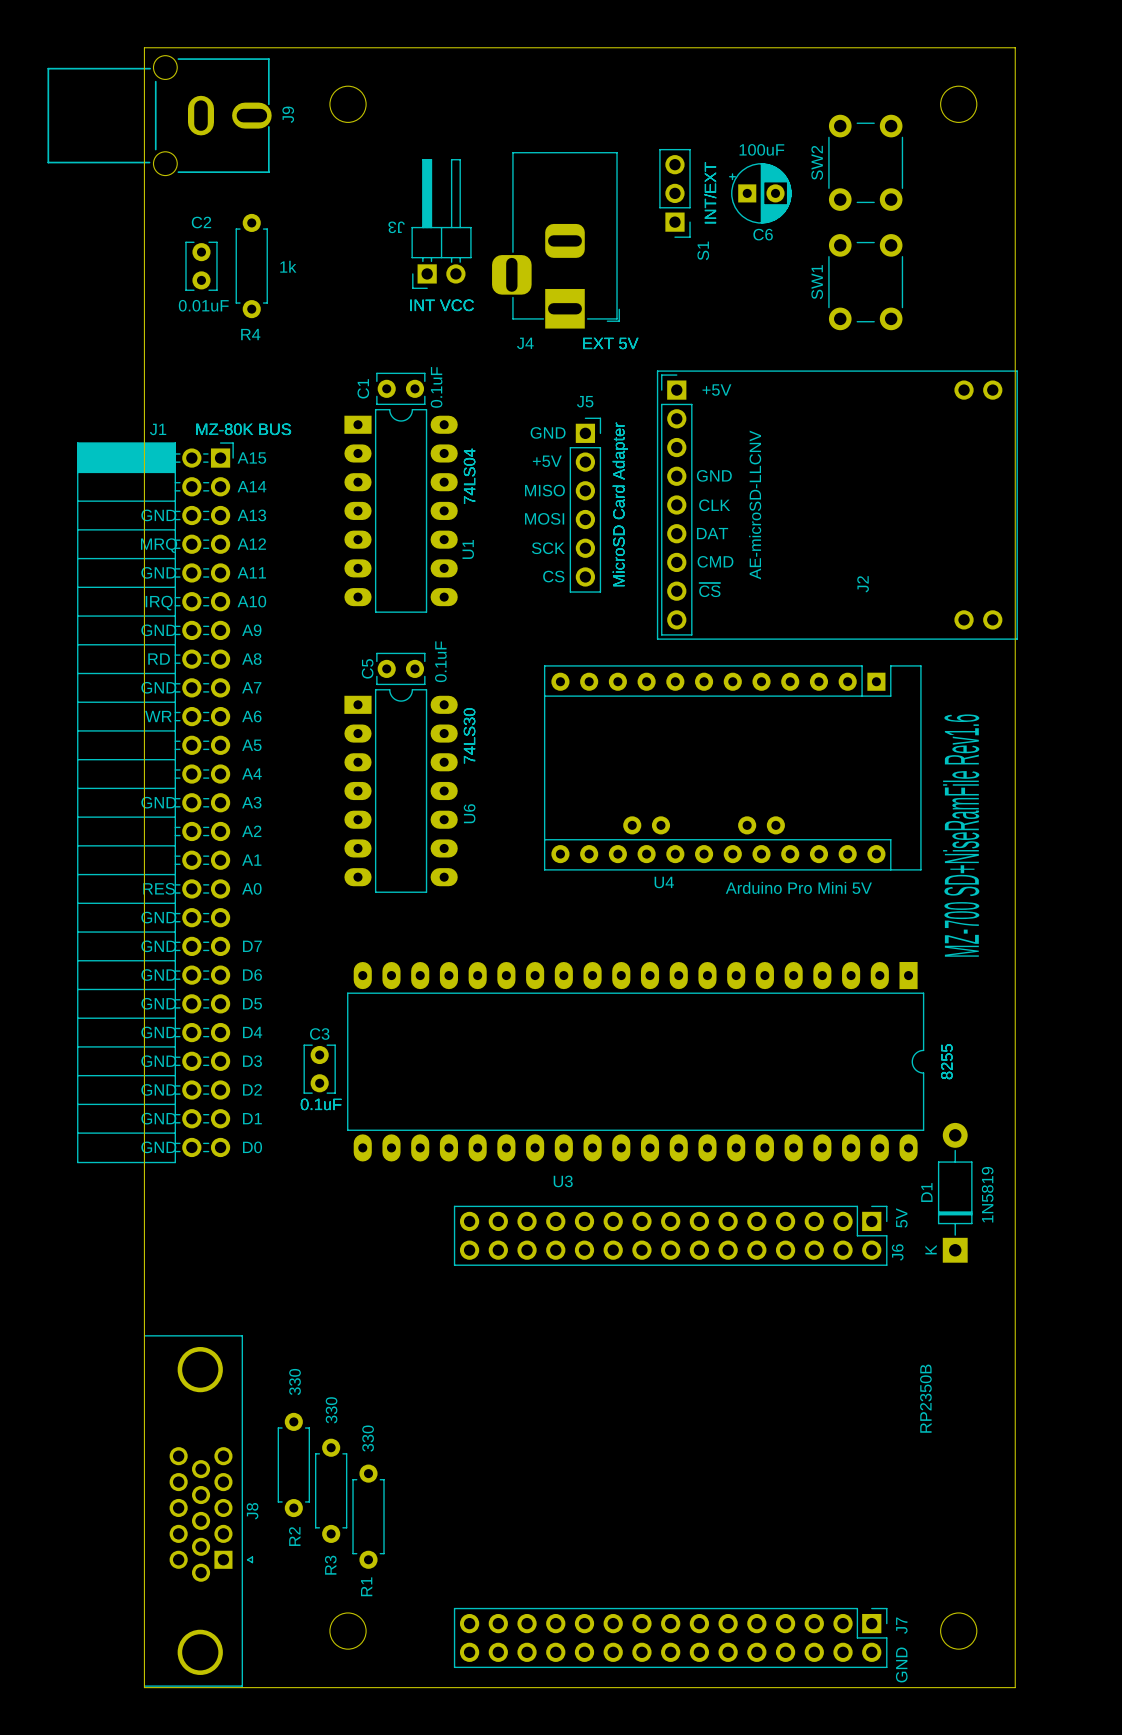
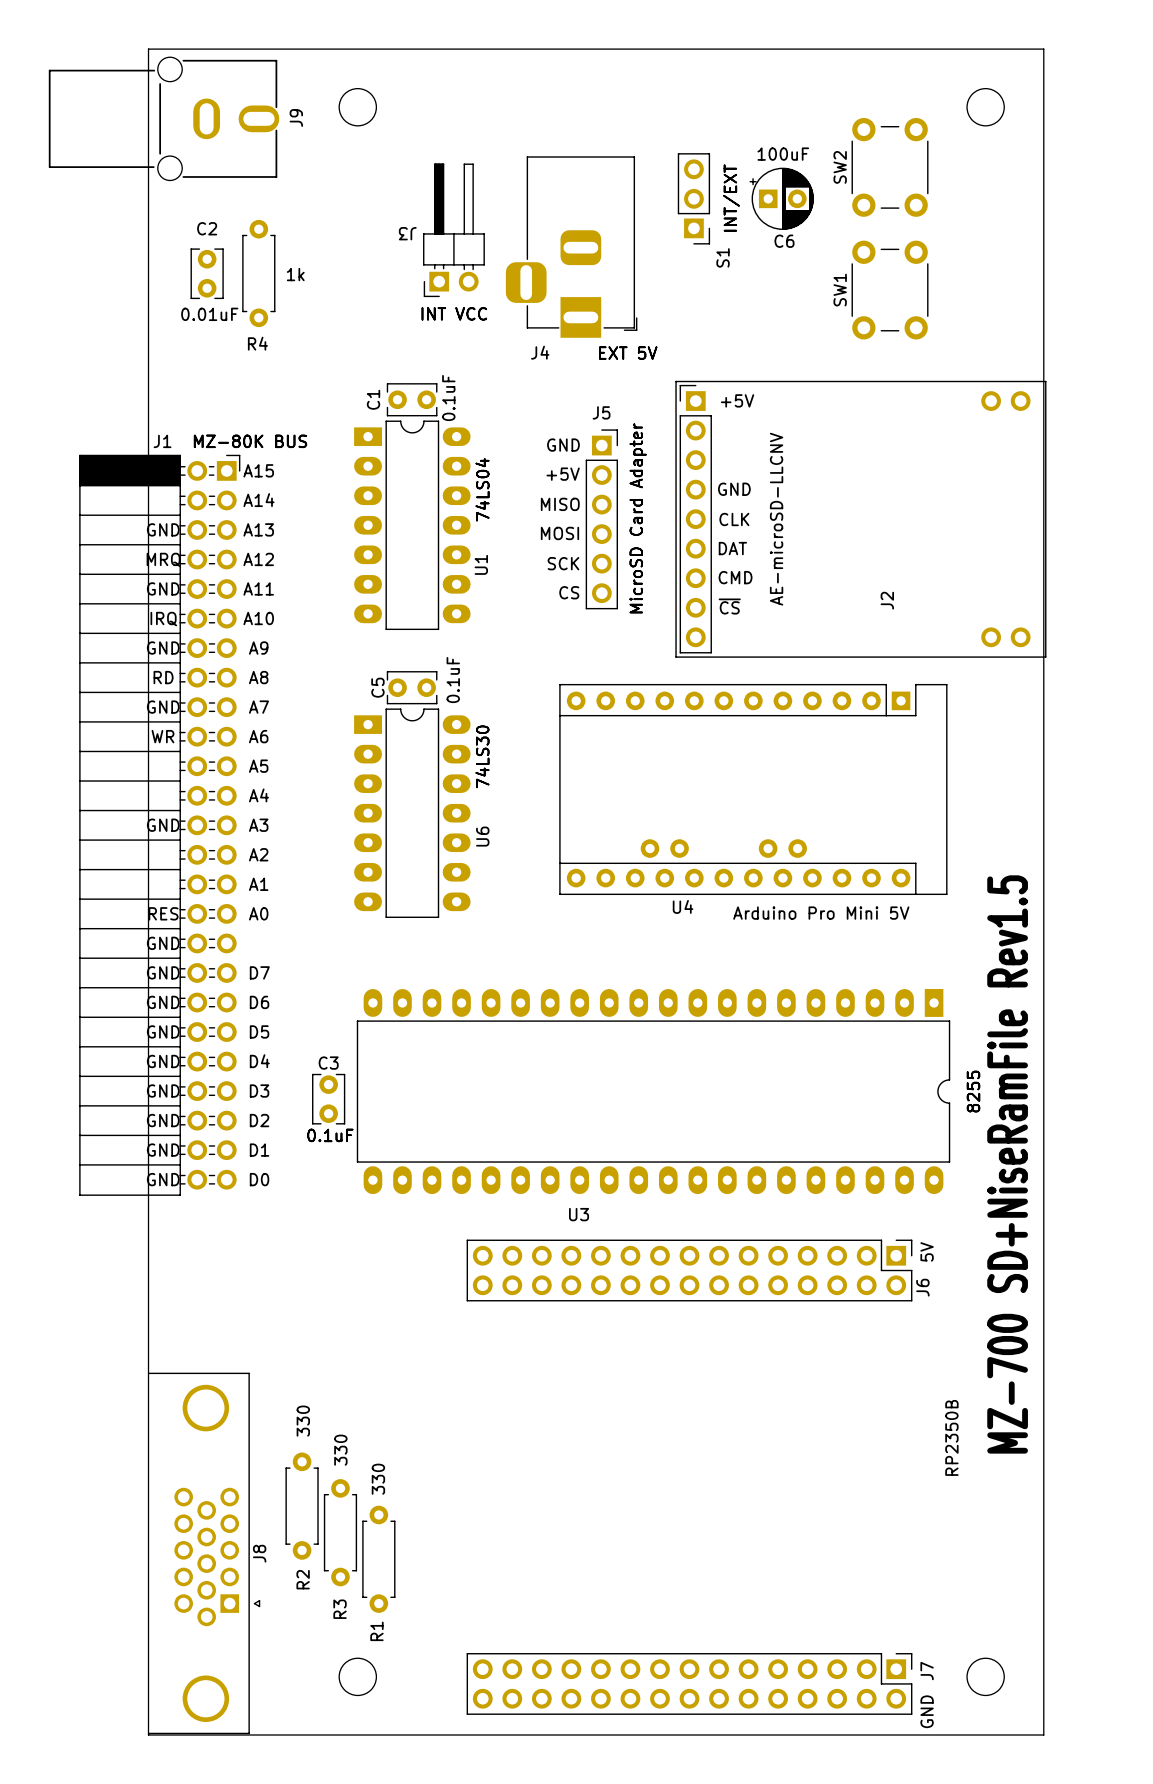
text: MZ-700 SD+NiseRamFile Rev1.6 (961, 835) -> none
text: none -> MZ-700 SD+NiseRamFile Rev1.5 (1007, 1164)
D1: (955, 1192) -> none
text: 1N5819 (987, 1194) -> none

